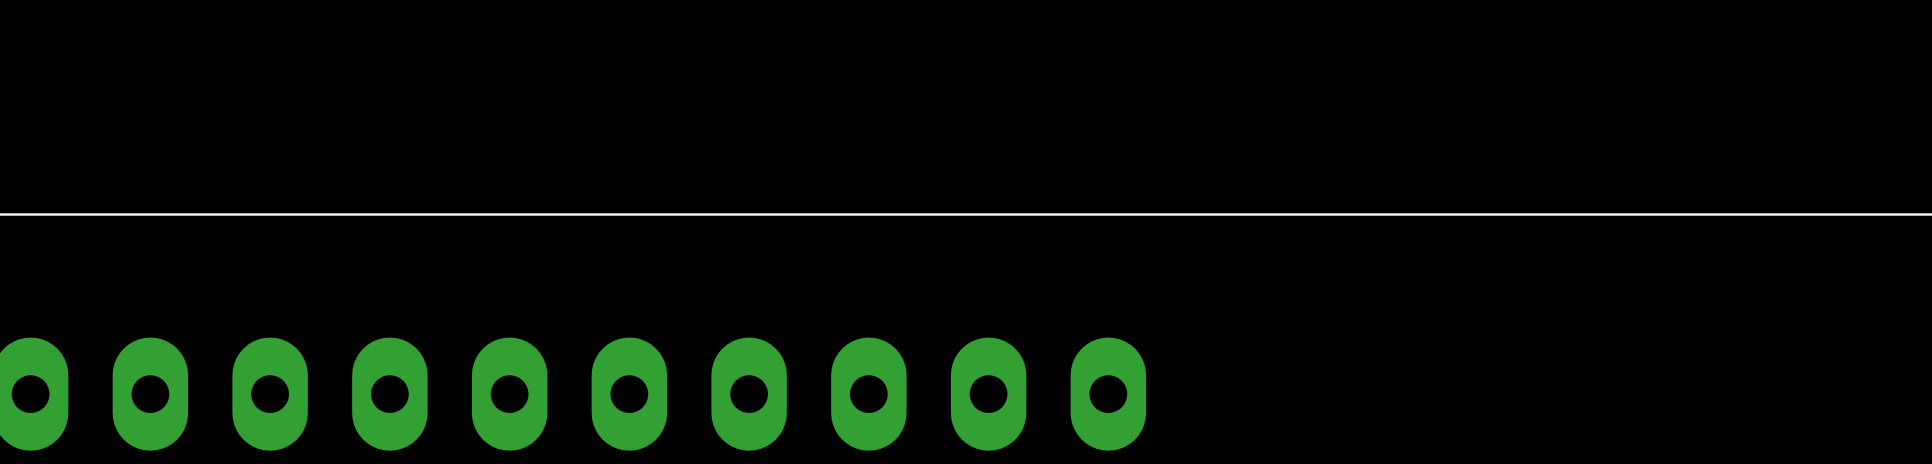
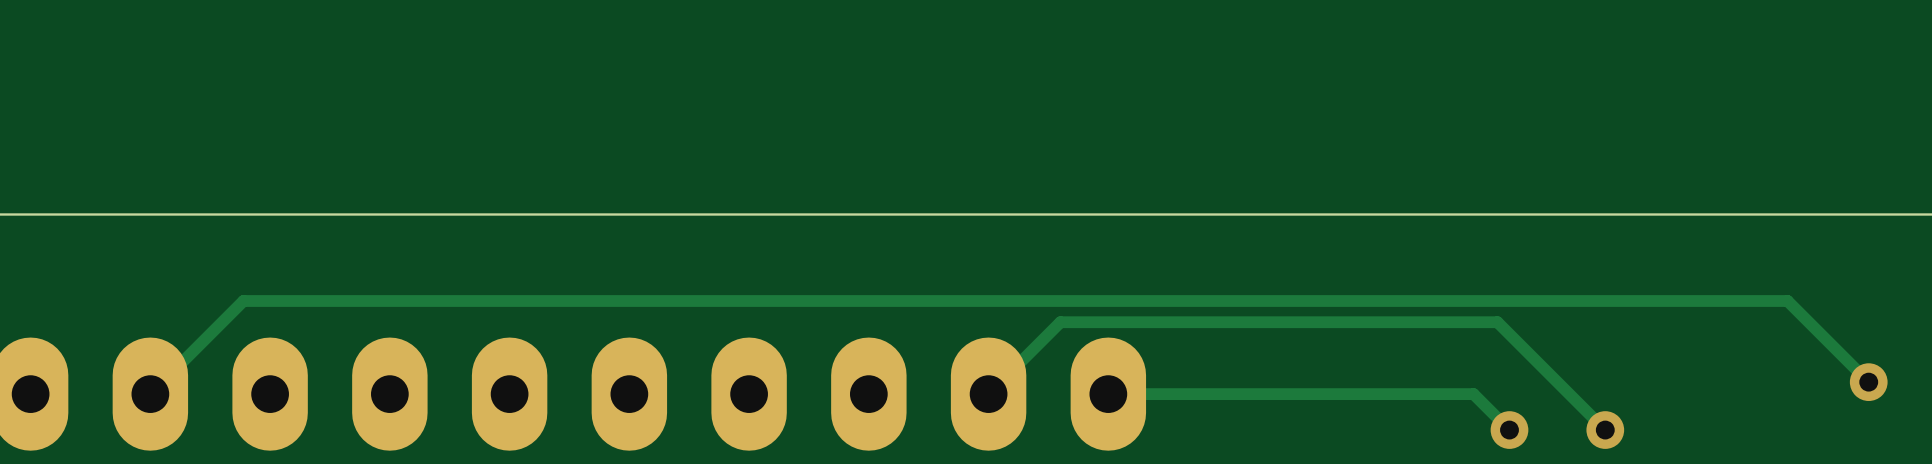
track: none -> (1868, 382) (1787, 301) (243, 301) (150, 394)
via: none -> (1868, 382)
track: none -> (988, 394) (1060, 322) (1497, 322) (1605, 430)
track: none -> (1108, 394) (1473, 394) (1509, 430)
via: none -> (1509, 430)
via: none -> (1605, 430)

